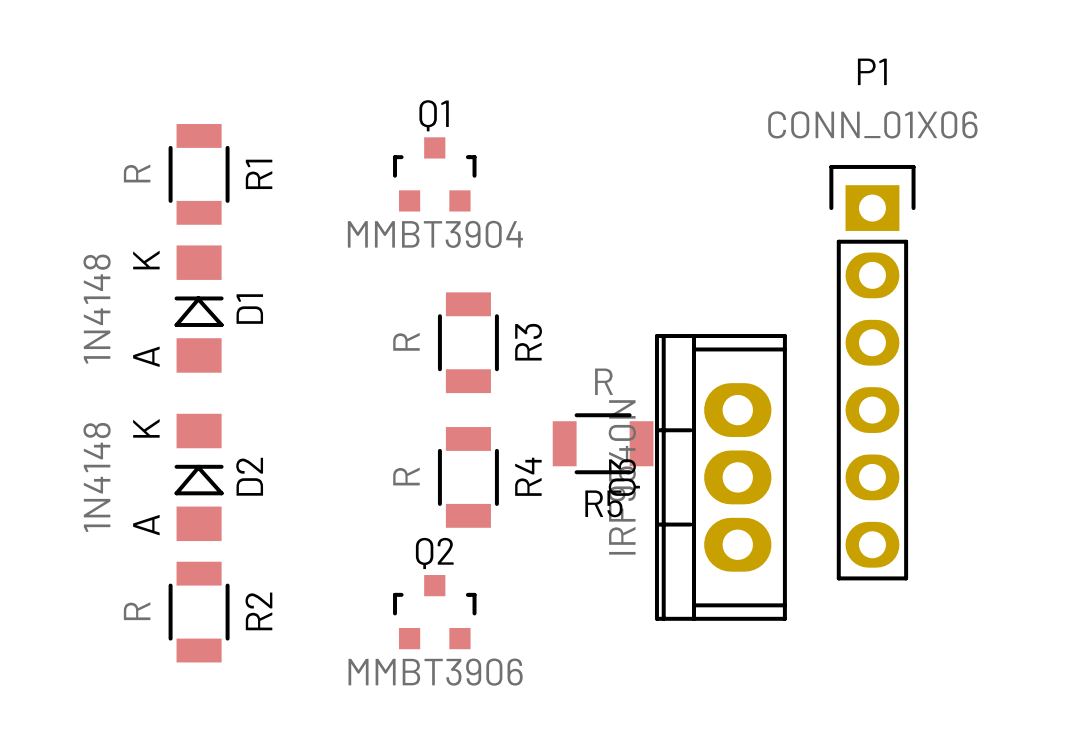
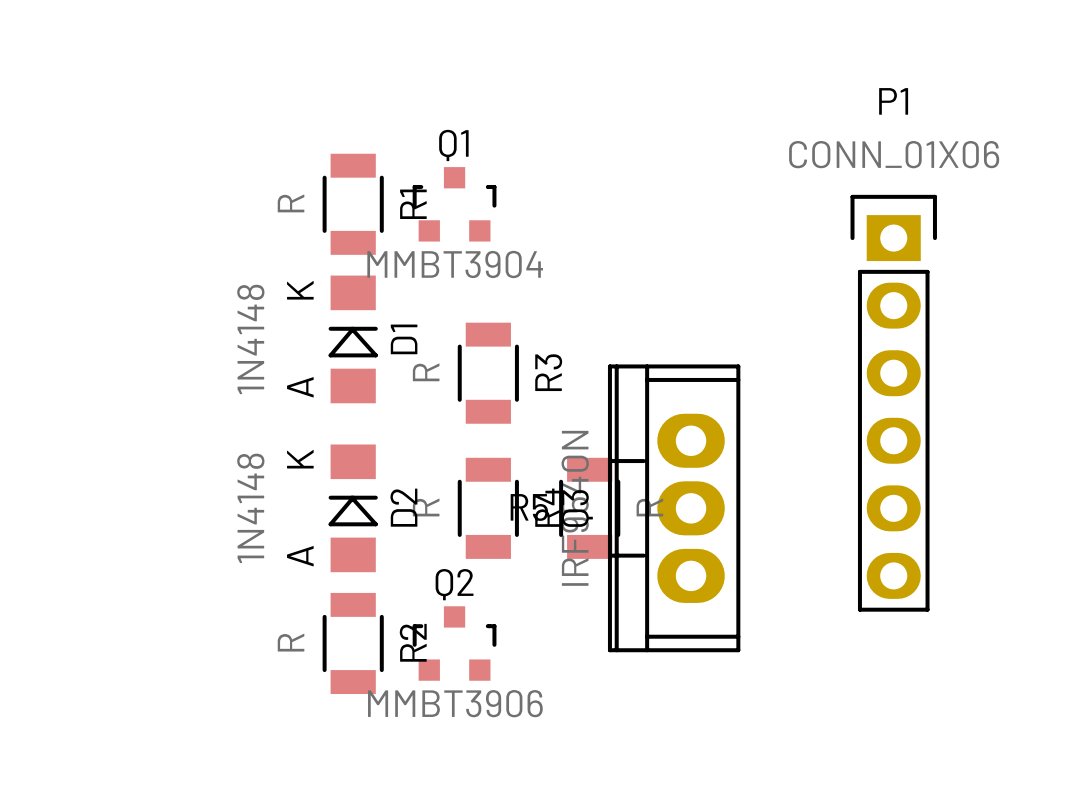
R1 position: (199, 174) -> (353, 204)
D1 position: (199, 309) -> (353, 339)
R5 rotation: 0° (603, 443) -> 90° clockwise (589, 508)
D2 position: (199, 477) -> (353, 508)
Q3 position: (720, 477) -> (674, 508)
R2 position: (199, 612) -> (353, 643)

